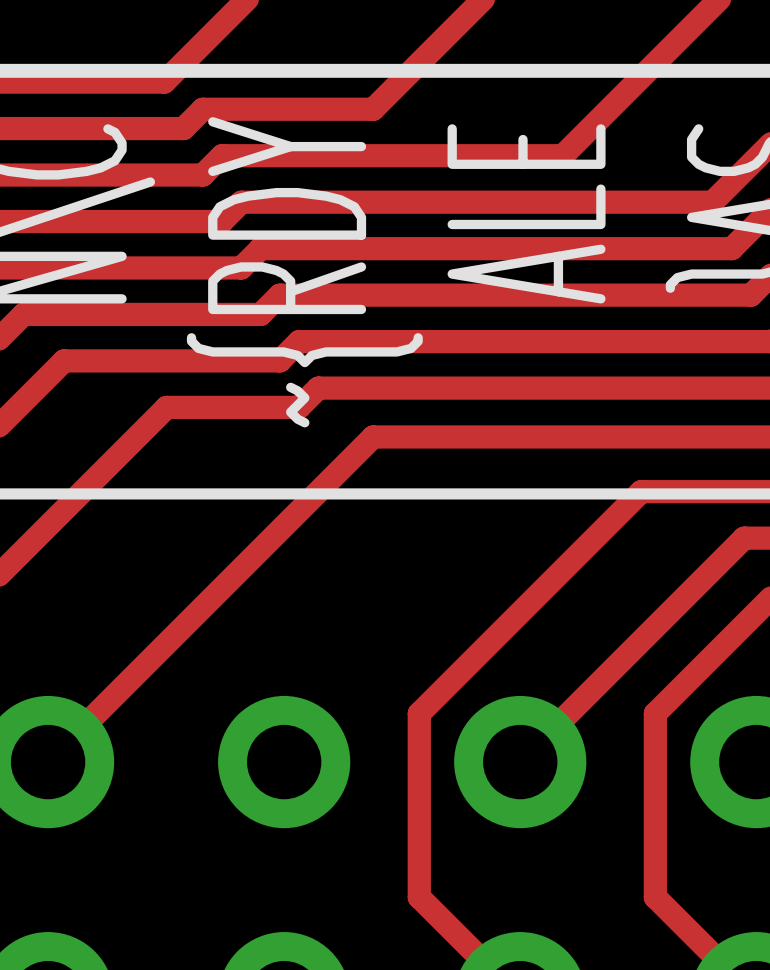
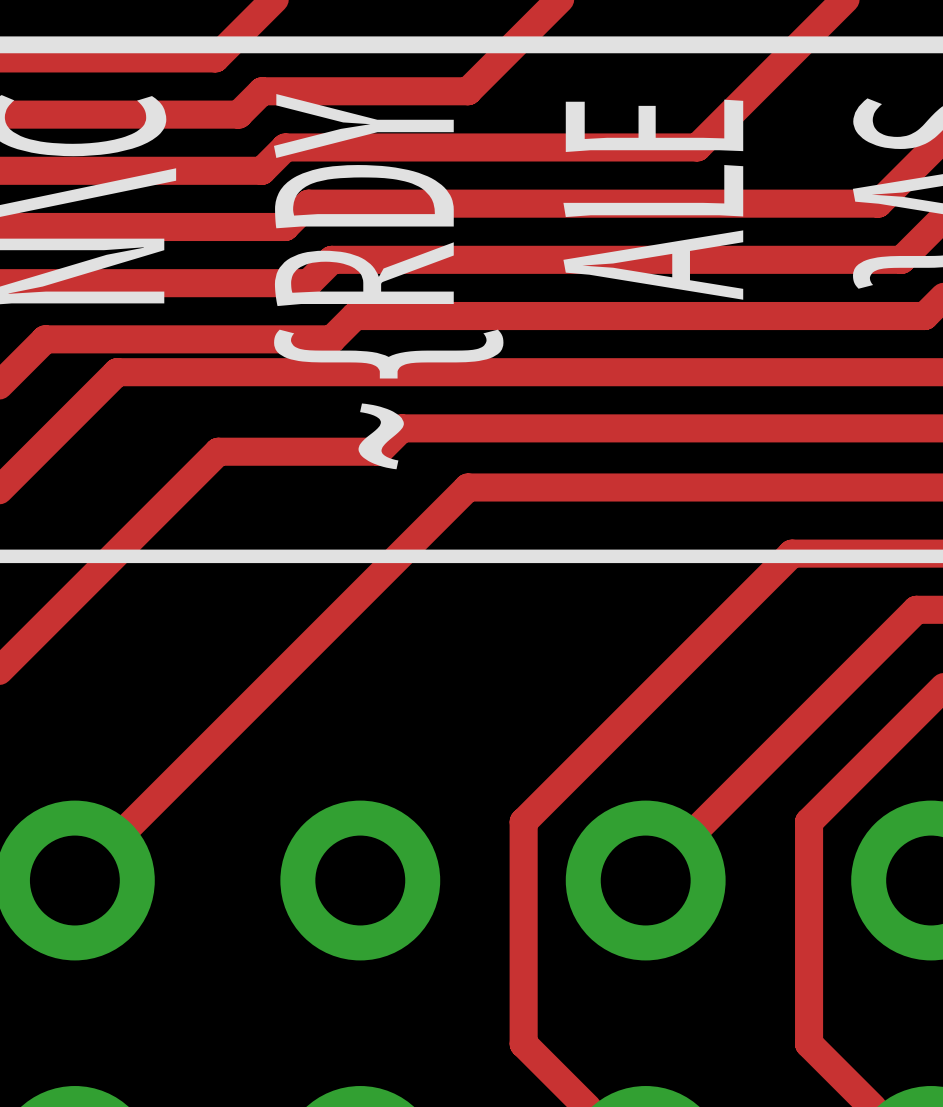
track: (299, 341) (279, 360) (64, 360) -> (378, 372) (117, 372) (94, 395)

